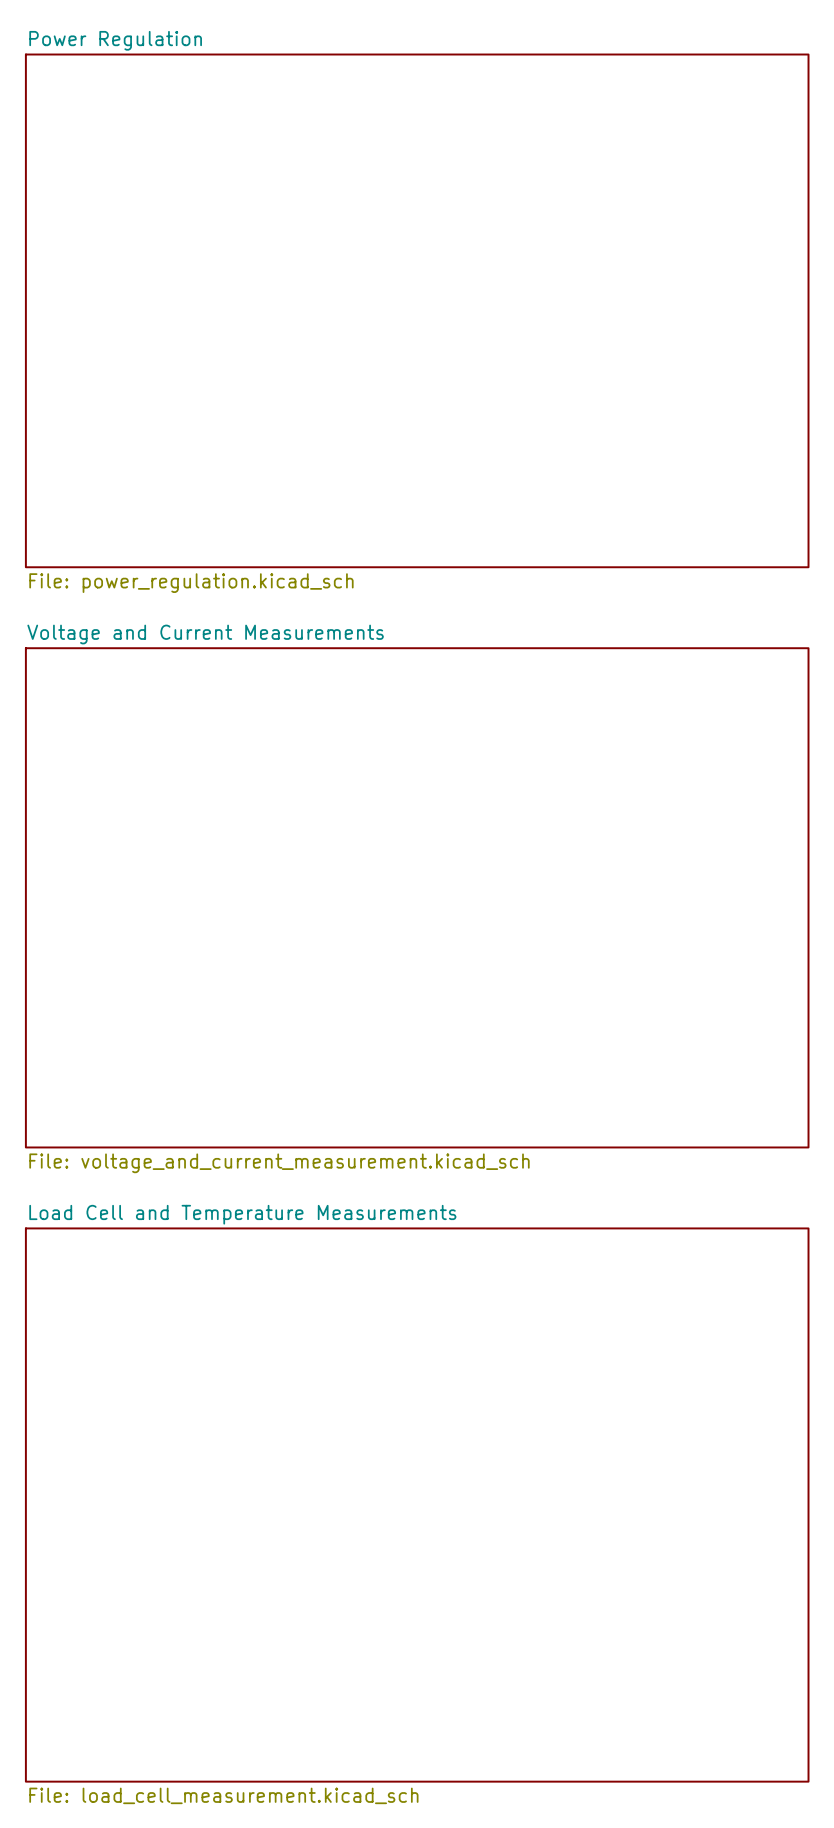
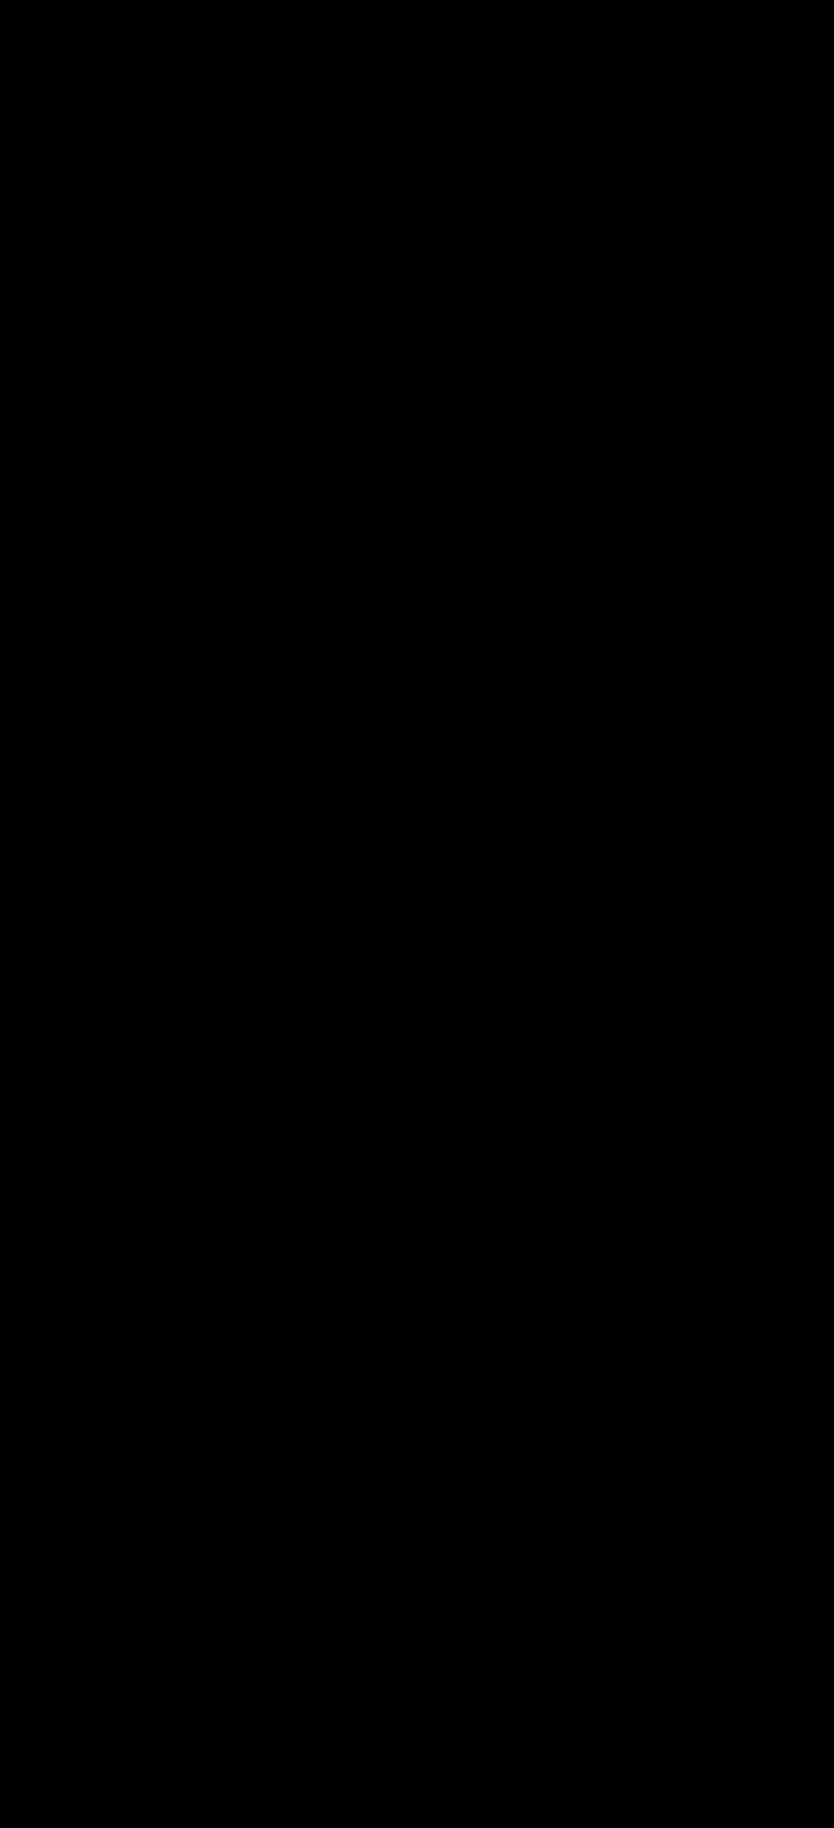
sheet Power Regulation: File: power_regulation.kicad_sch (417, 310) -> none
sheet Voltage and Current Measurements: File: voltage_and_current_measurement.kicad_sch (417, 897) -> none
sheet Load Cell and Temperature Measurements: File: load_cell_measurement.kicad_sch (417, 1505) -> none

